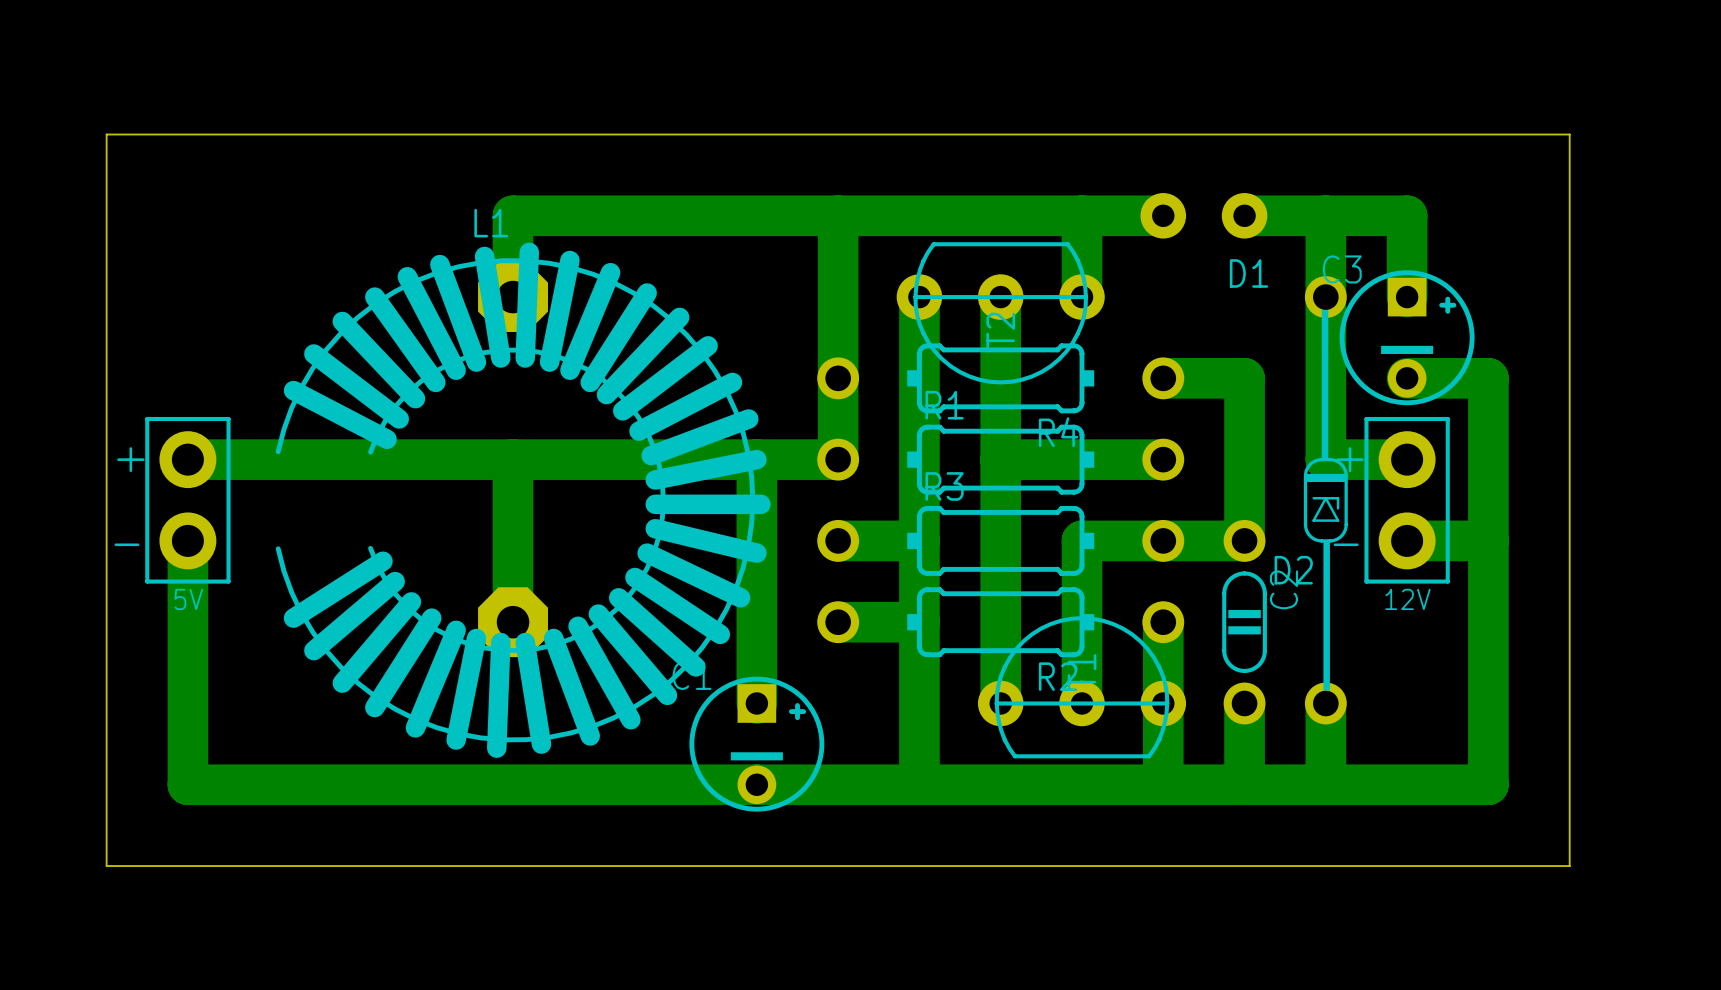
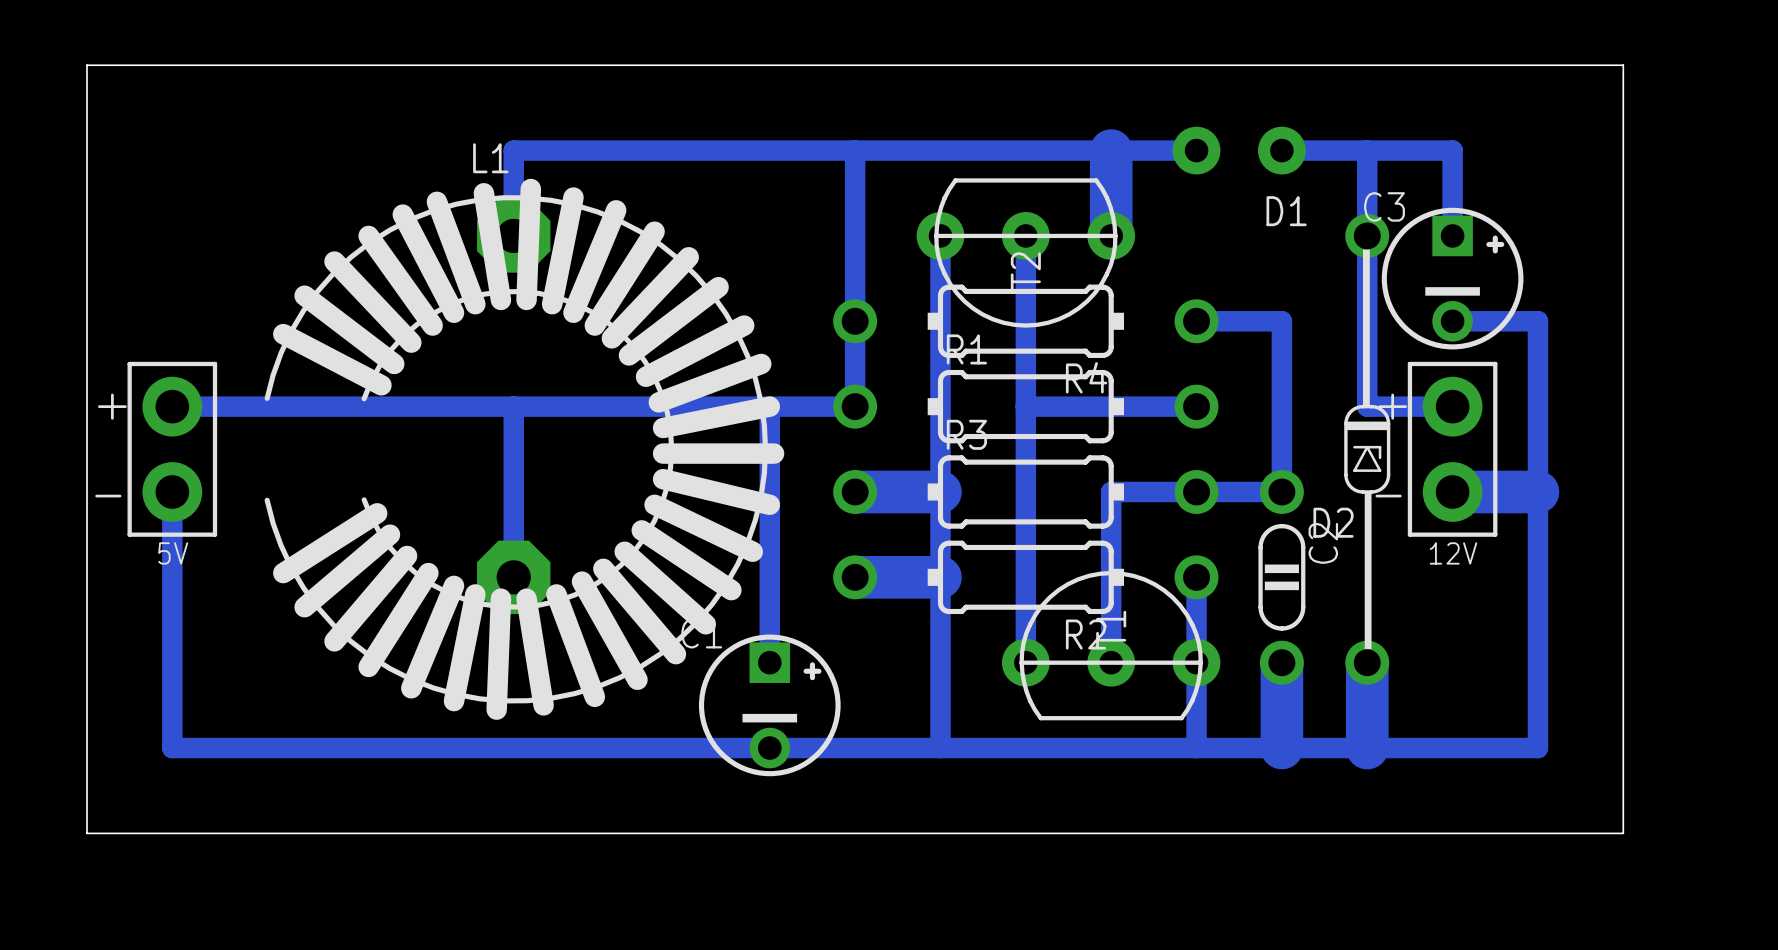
bottom track width: thick (838, 215) (838, 459) (187, 459) -> thin (855, 150) (855, 406) (172, 406)
bottom track width: thick (1163, 215) (513, 215) (513, 297) -> thin (1196, 150) (513, 150) (513, 235)
bottom track width: thick (1244, 215) (1407, 215) (1407, 297) -> thin (1281, 150) (1452, 150) (1452, 235)
bottom track width: thick (1325, 215) (1325, 459) (1407, 459) -> thin (1367, 150) (1367, 406) (1452, 406)
bottom track width: thick (919, 297) (919, 784) -> thin (940, 235) (940, 748)
bottom track width: thick (1000, 297) (1000, 703) -> thin (1025, 235) (1025, 662)
bottom track width: thick (1163, 378) (1244, 378) (1244, 540) (1082, 540) (1082, 703) -> thin (1196, 321) (1281, 321) (1281, 491) (1111, 491) (1111, 662)
bottom track width: thick (1407, 378) (1488, 378) (1488, 784) (187, 784) (187, 540) -> thin (1452, 321) (1537, 321) (1537, 748) (172, 748) (172, 491)
bottom track width: thick (513, 459) (513, 622) -> thin (513, 406) (513, 577)
bottom track width: thick (756, 459) (756, 703) -> thin (769, 406) (769, 662)
bottom track width: thick (1000, 459) (1163, 459) -> thin (1025, 406) (1196, 406)
bottom track width: thick (1163, 622) (1163, 784) -> thin (1196, 577) (1196, 748)

